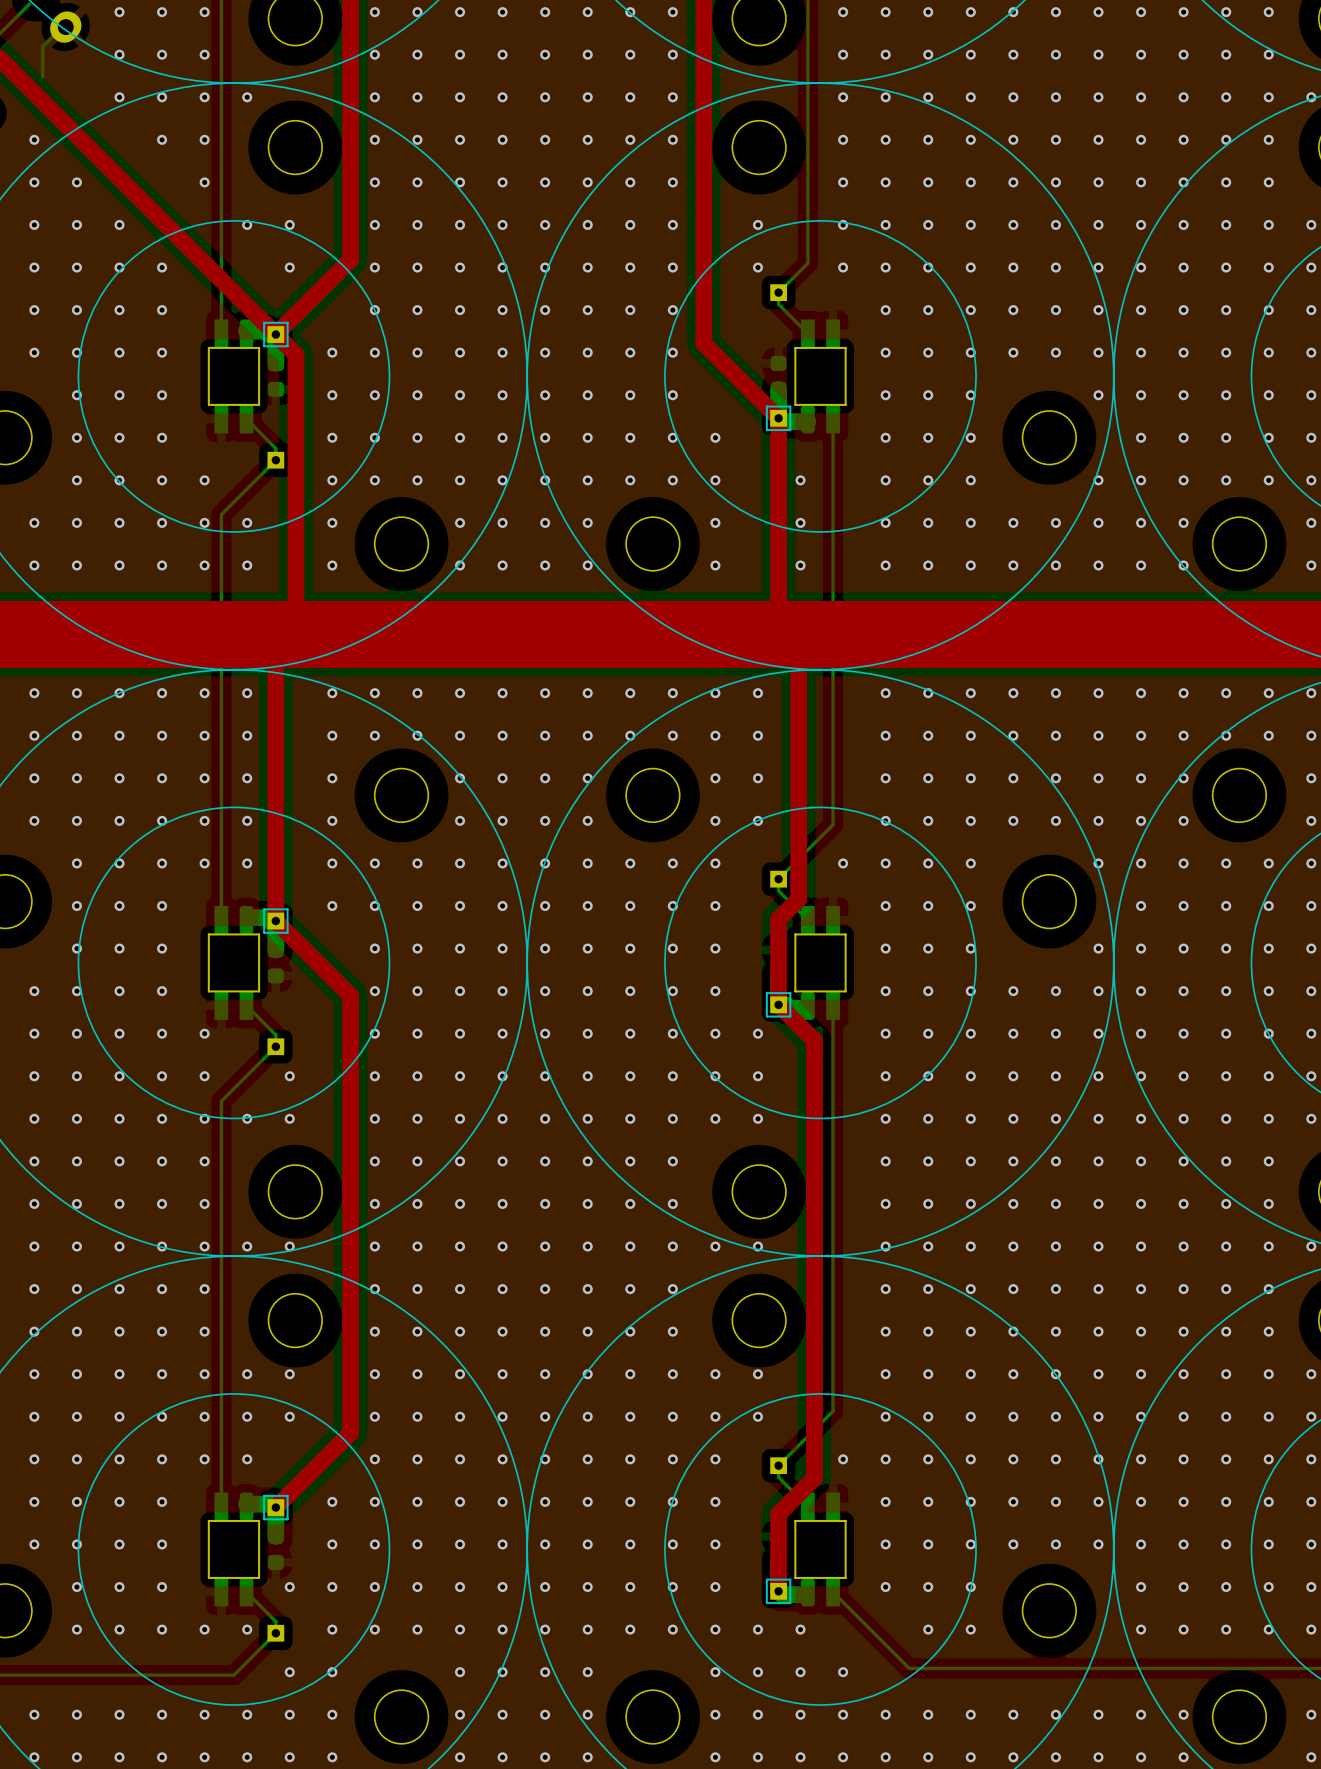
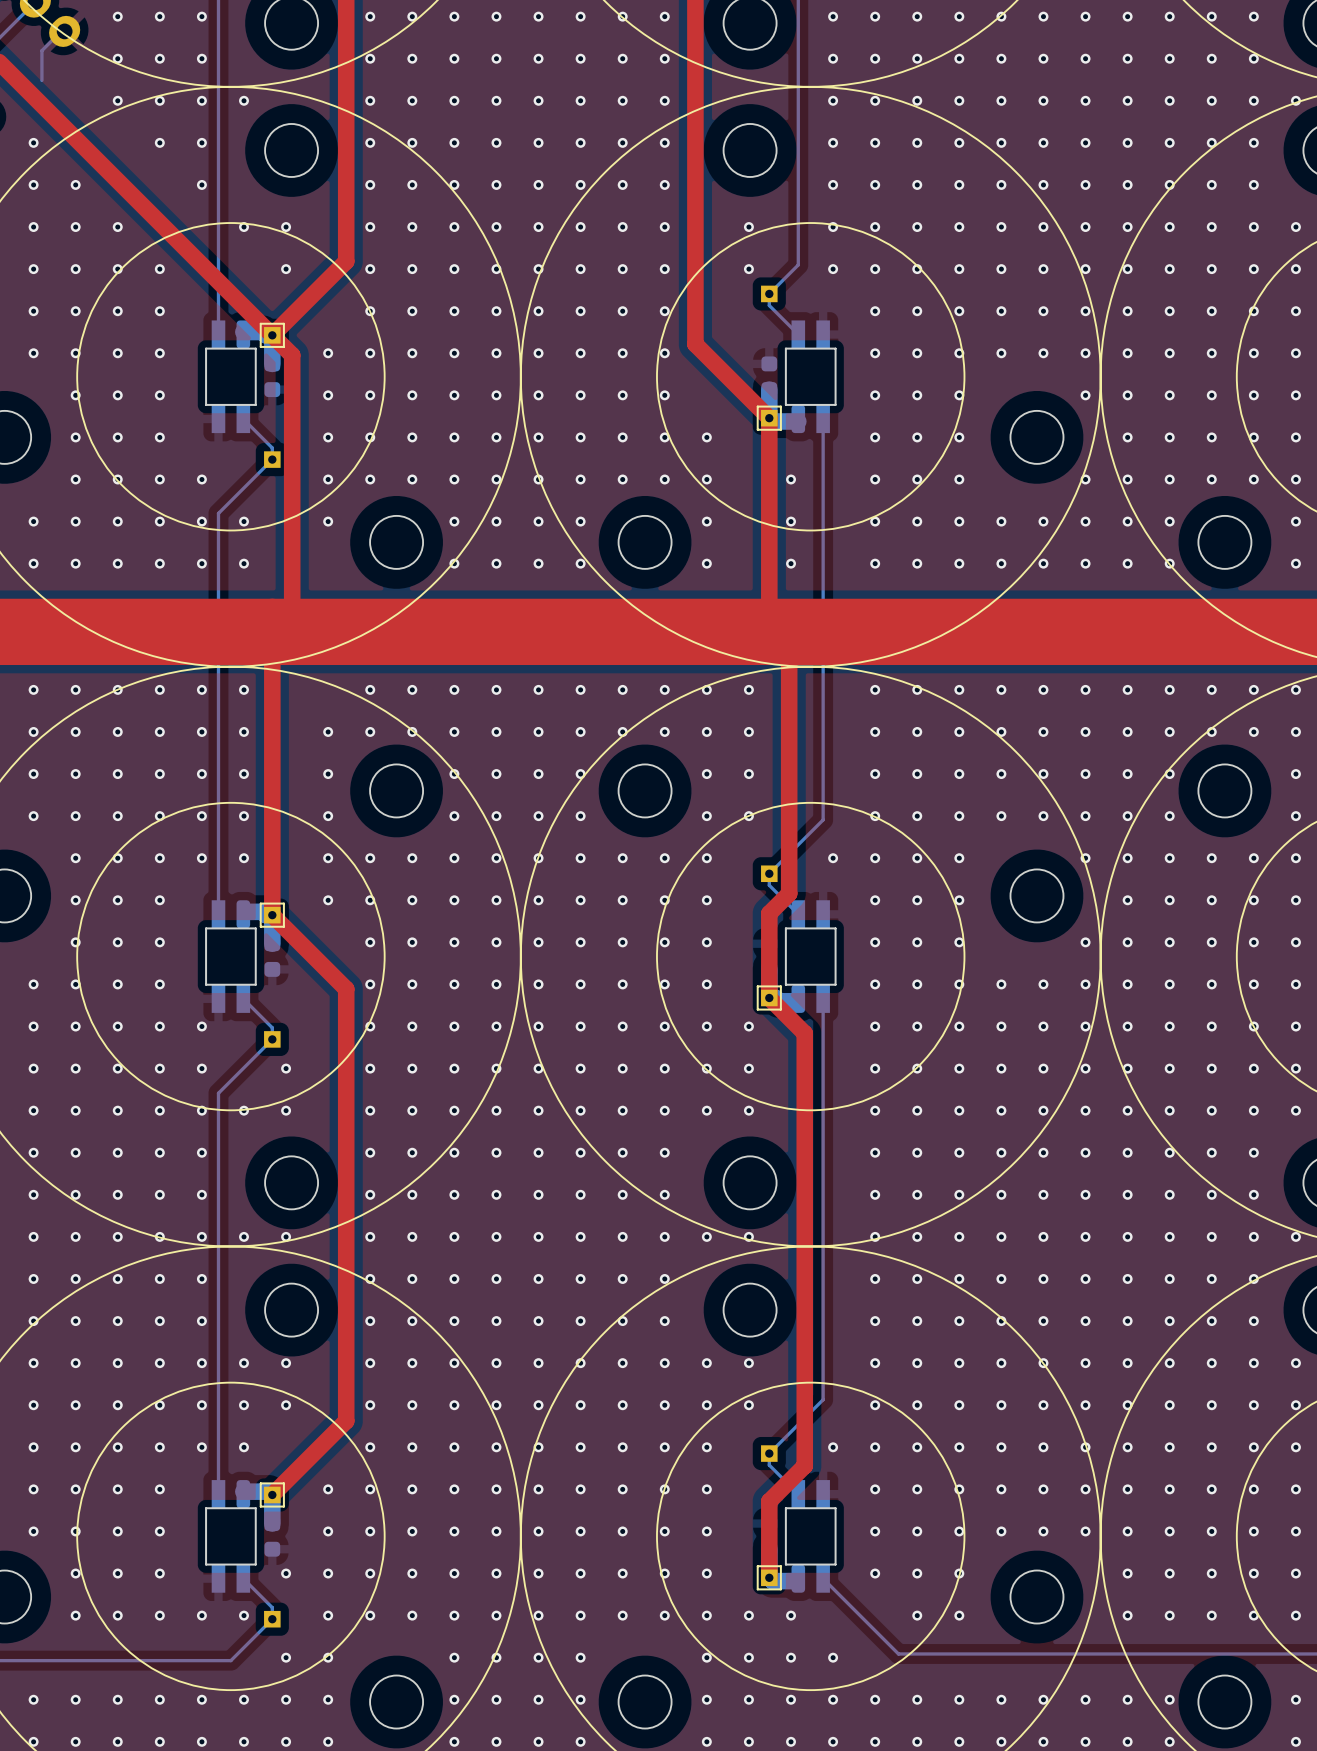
via: (332, 565) -> none
via: (332, 693) -> none

